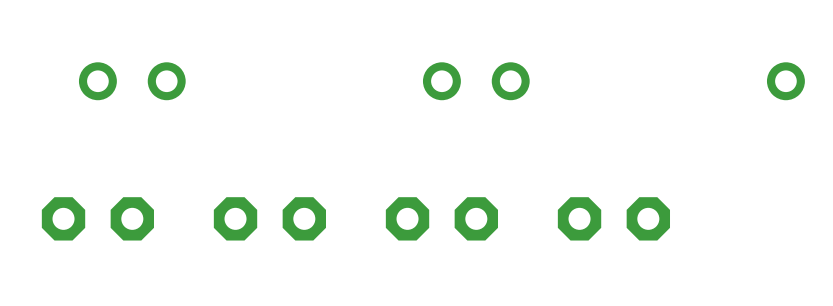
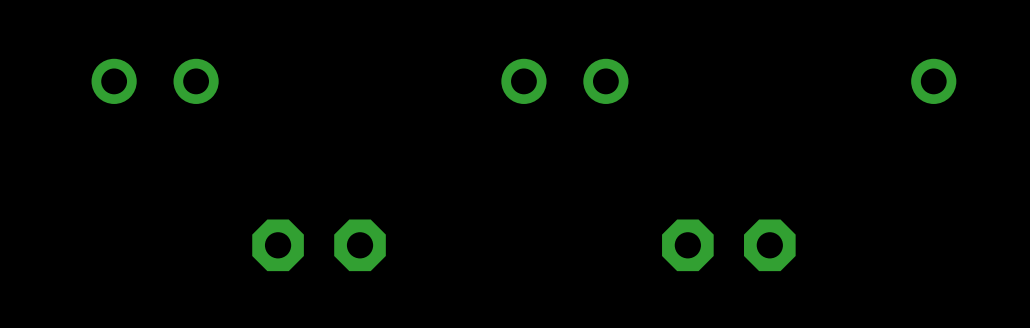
part: (97, 218) -> none
part: (441, 218) -> none

